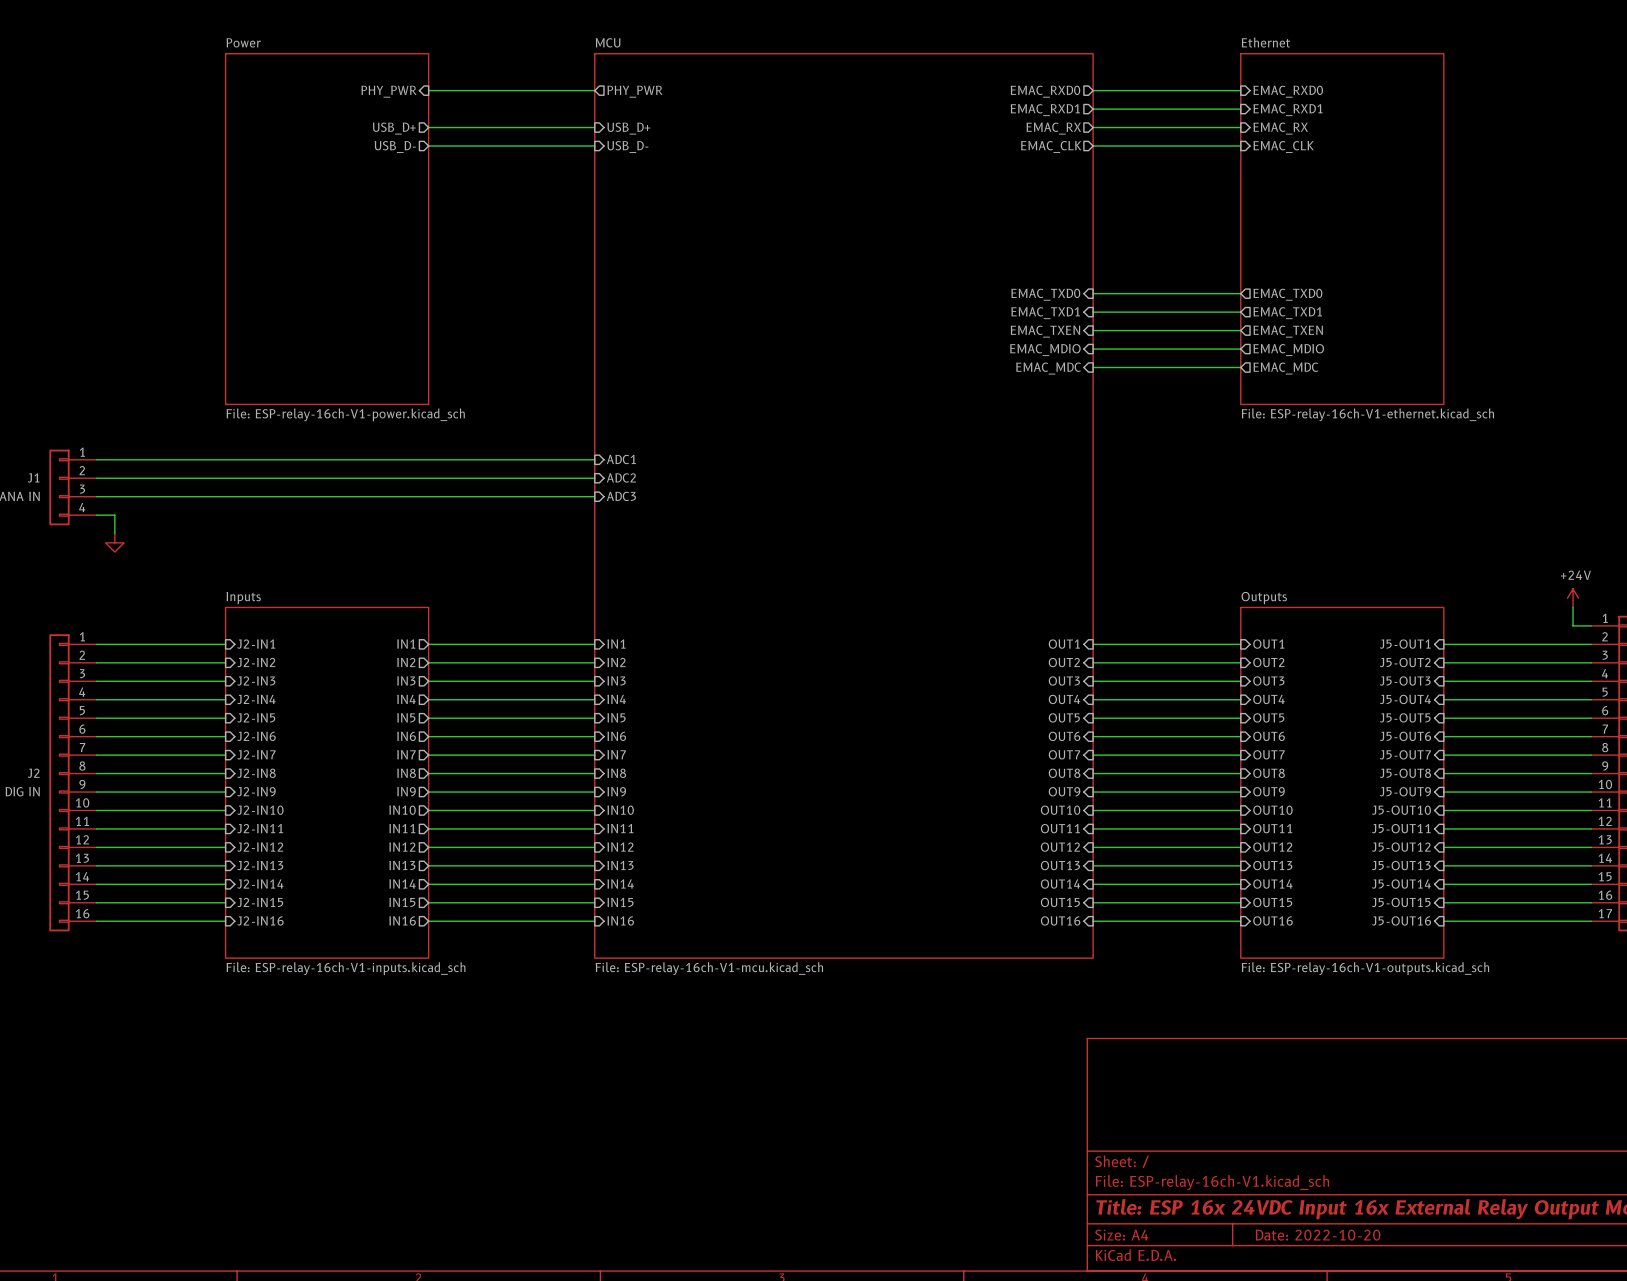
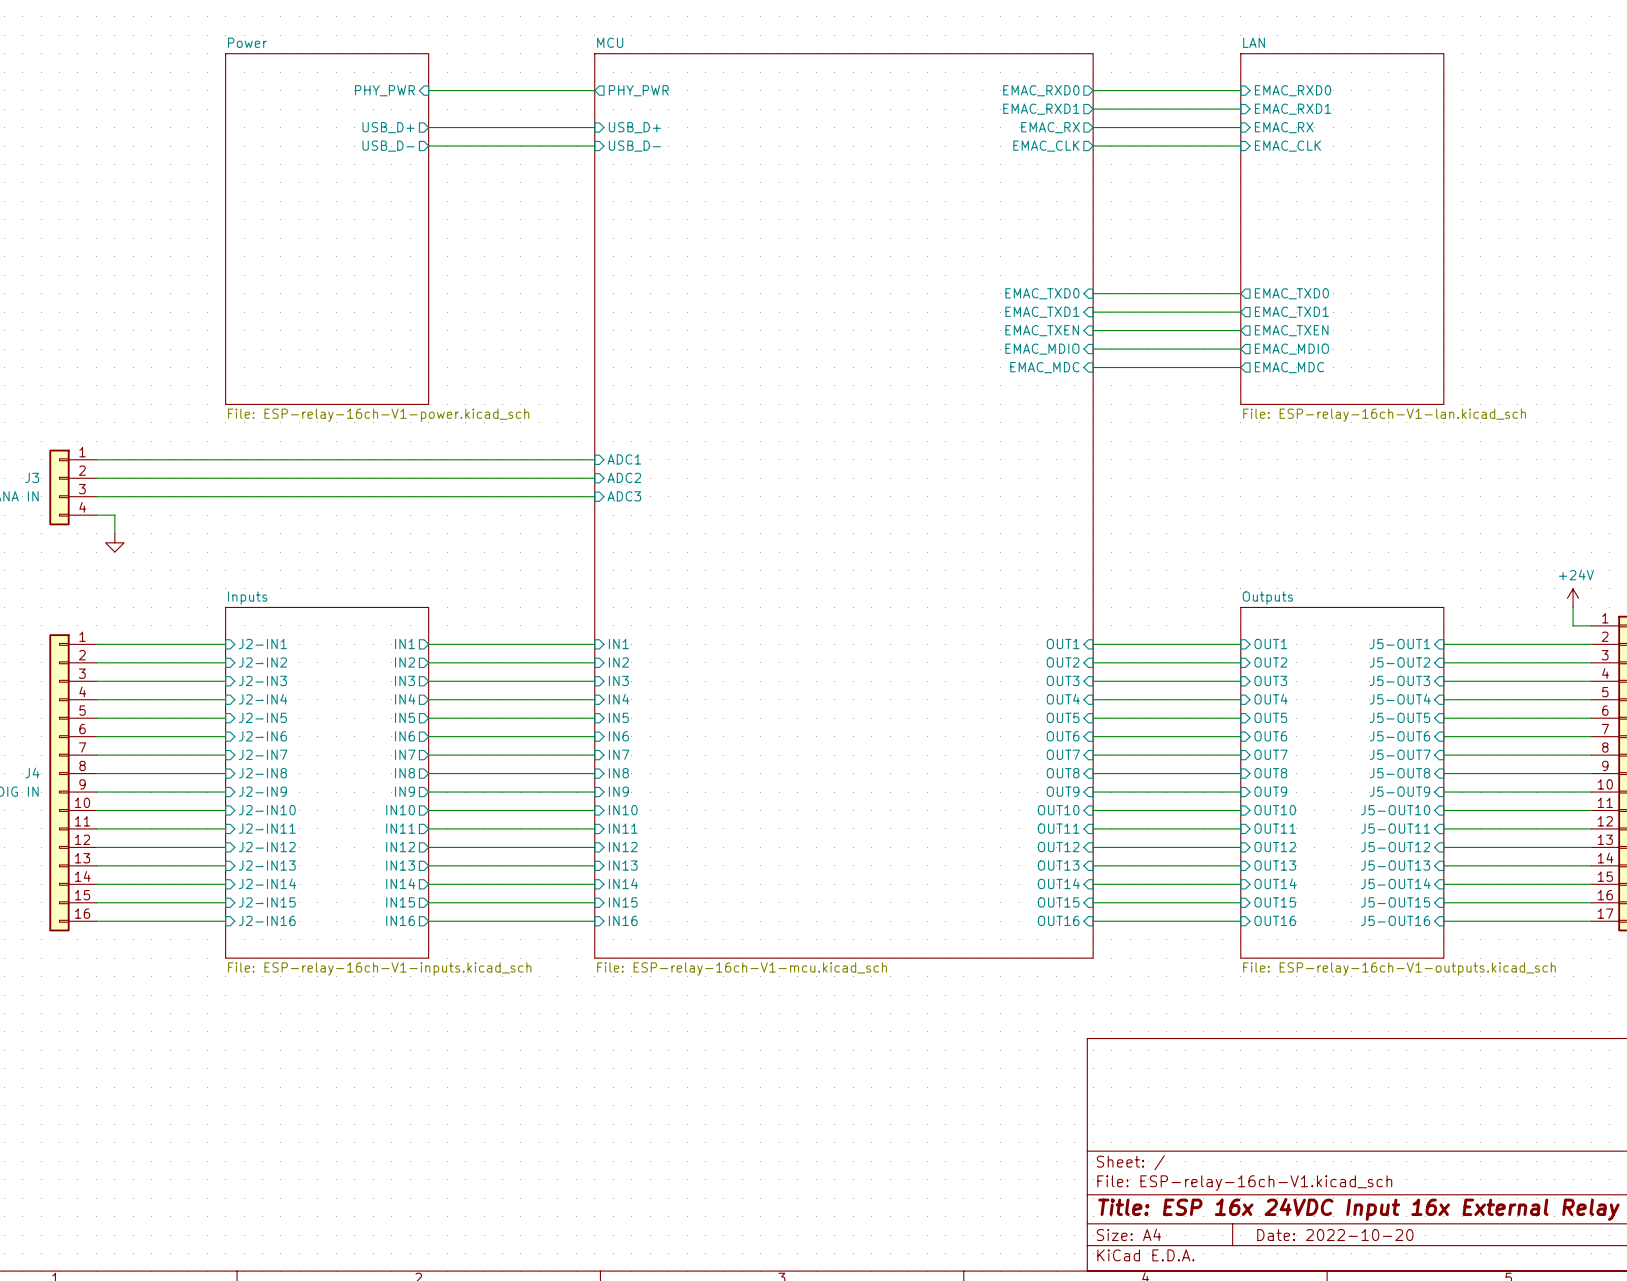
sheet Ethernet name: Ethernet (1265, 42) -> LAN (1254, 42)
sheet Ethernet value: File: ESP-relay-16ch-V1-ethernet.kicad_sch (1367, 414) -> File: ESP-relay-16ch-V1-lan.kicad_sch (1384, 415)
J1 name: J1 (33, 477) -> J3 (32, 477)
J2 name: J2 (33, 773) -> J4 (32, 773)

